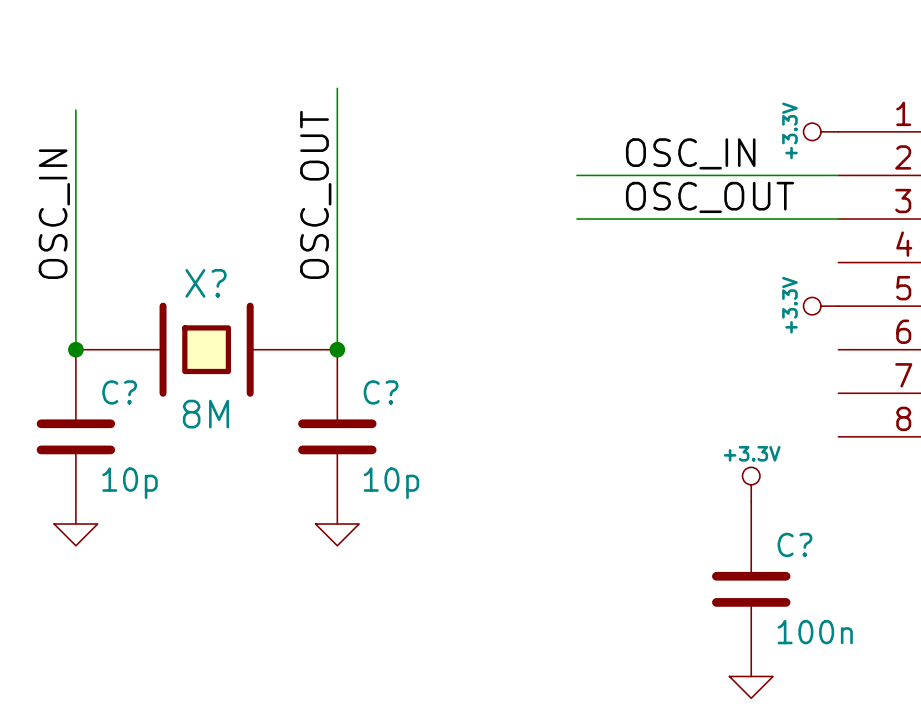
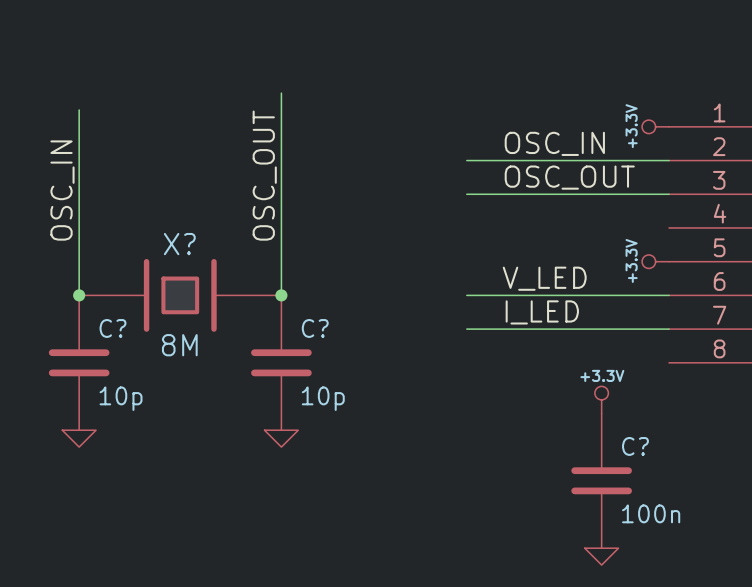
label: none -> V_LED (544, 278)
wire: none -> (466, 295) (669, 295)
label: none -> I_LED (542, 312)
wire: none -> (466, 329) (669, 329)

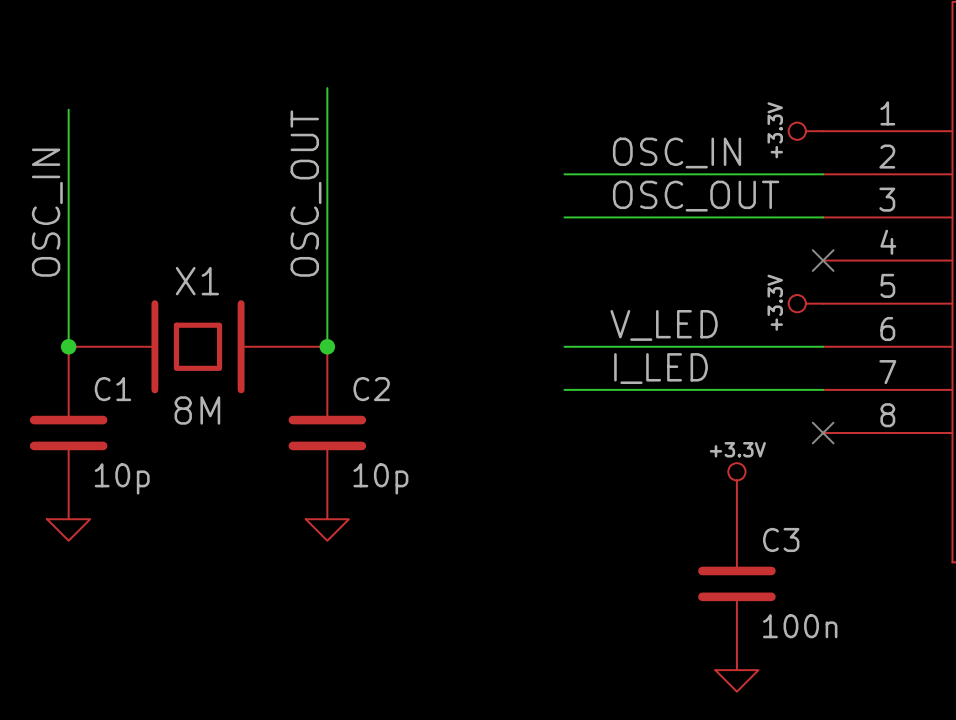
no-connect mark: none -> (823, 260)
X? name: X? (179, 244) -> X1 (197, 281)
C? name: C? (112, 328) -> C1 (112, 389)
C? name: C? (315, 328) -> C2 (371, 389)
no-connect mark: none -> (823, 433)
C? name: C? (635, 446) -> C3 (781, 539)

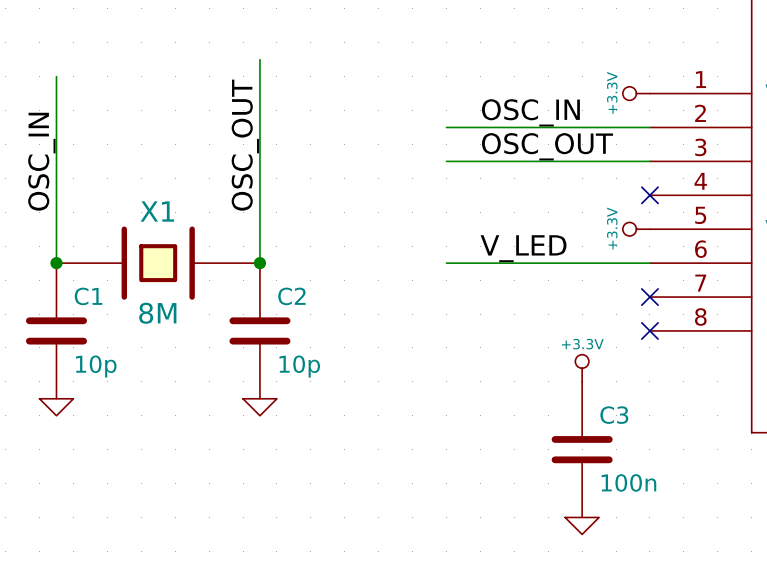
label: I_LED (661, 368) -> none
wire: (564, 389) (823, 389) -> none
no-connect mark: none -> (649, 297)

